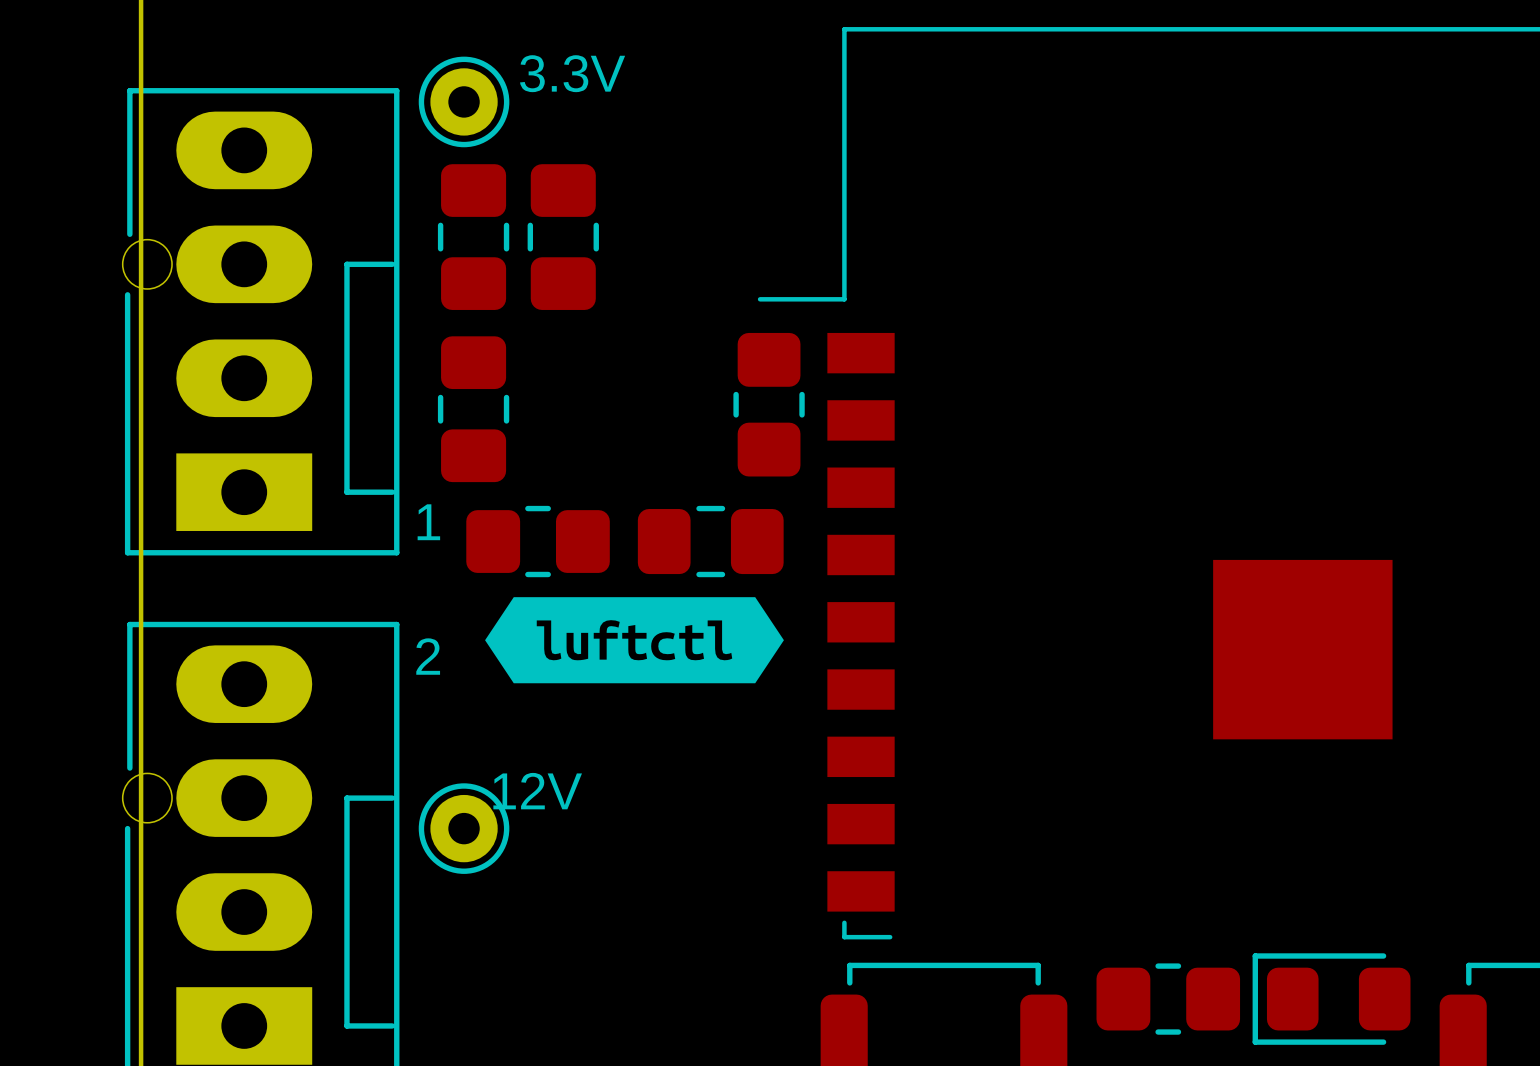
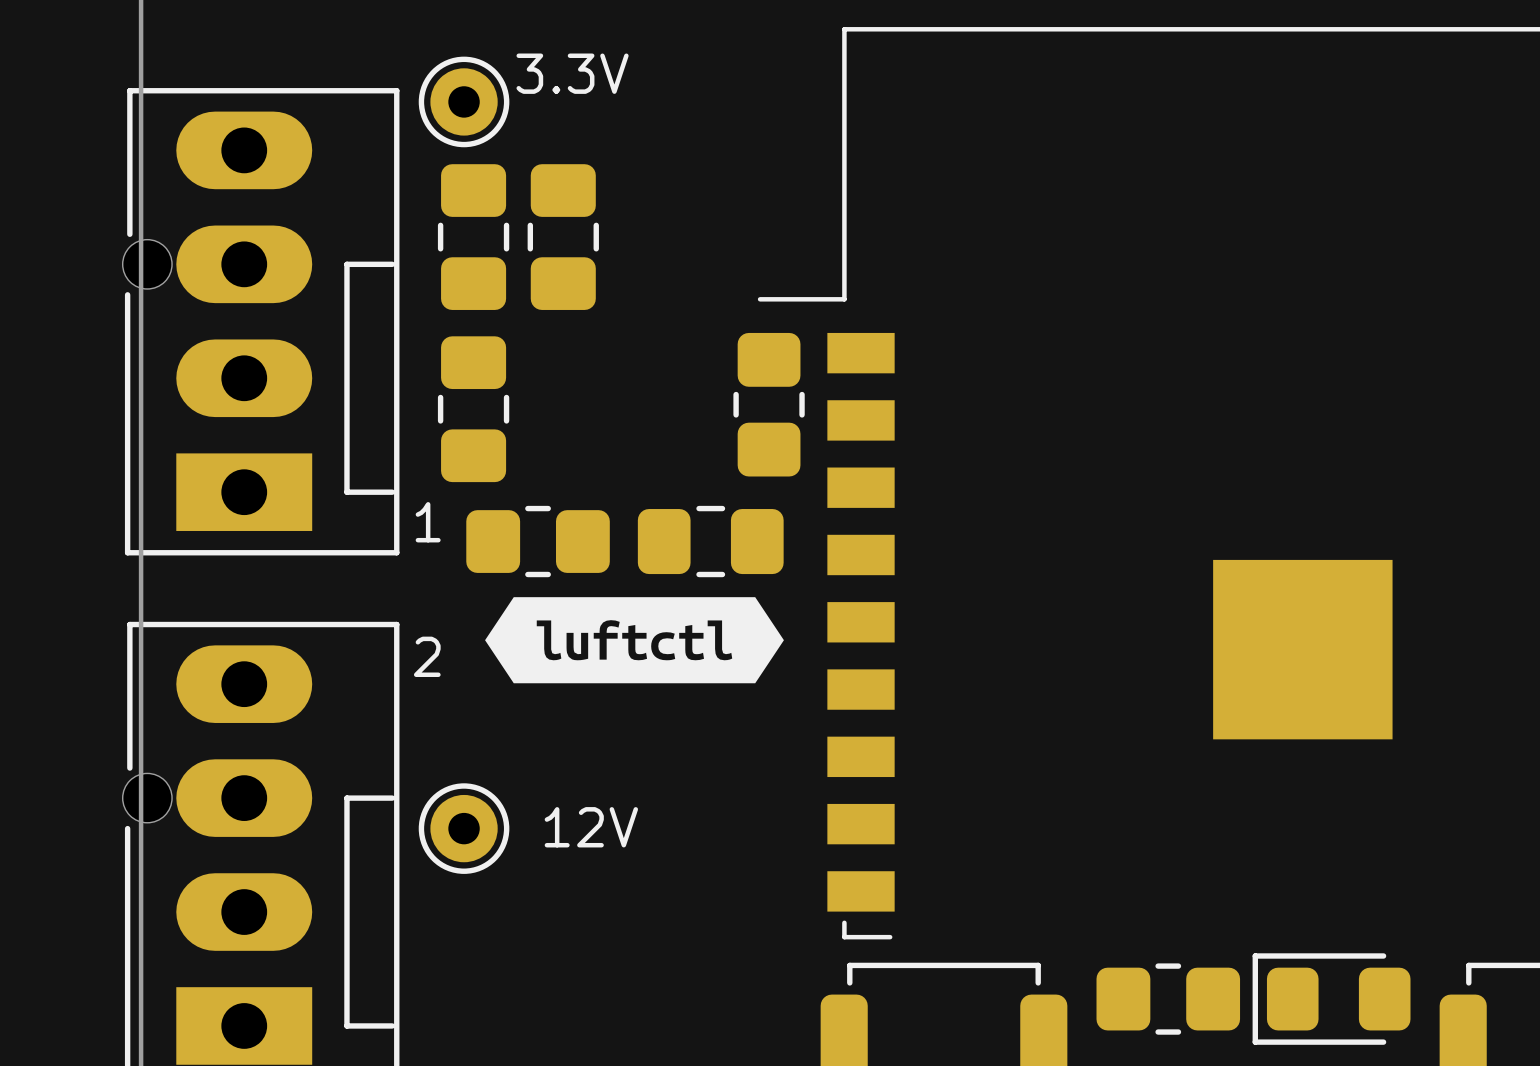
text position: 12V (537, 791) -> 12V (591, 827)

